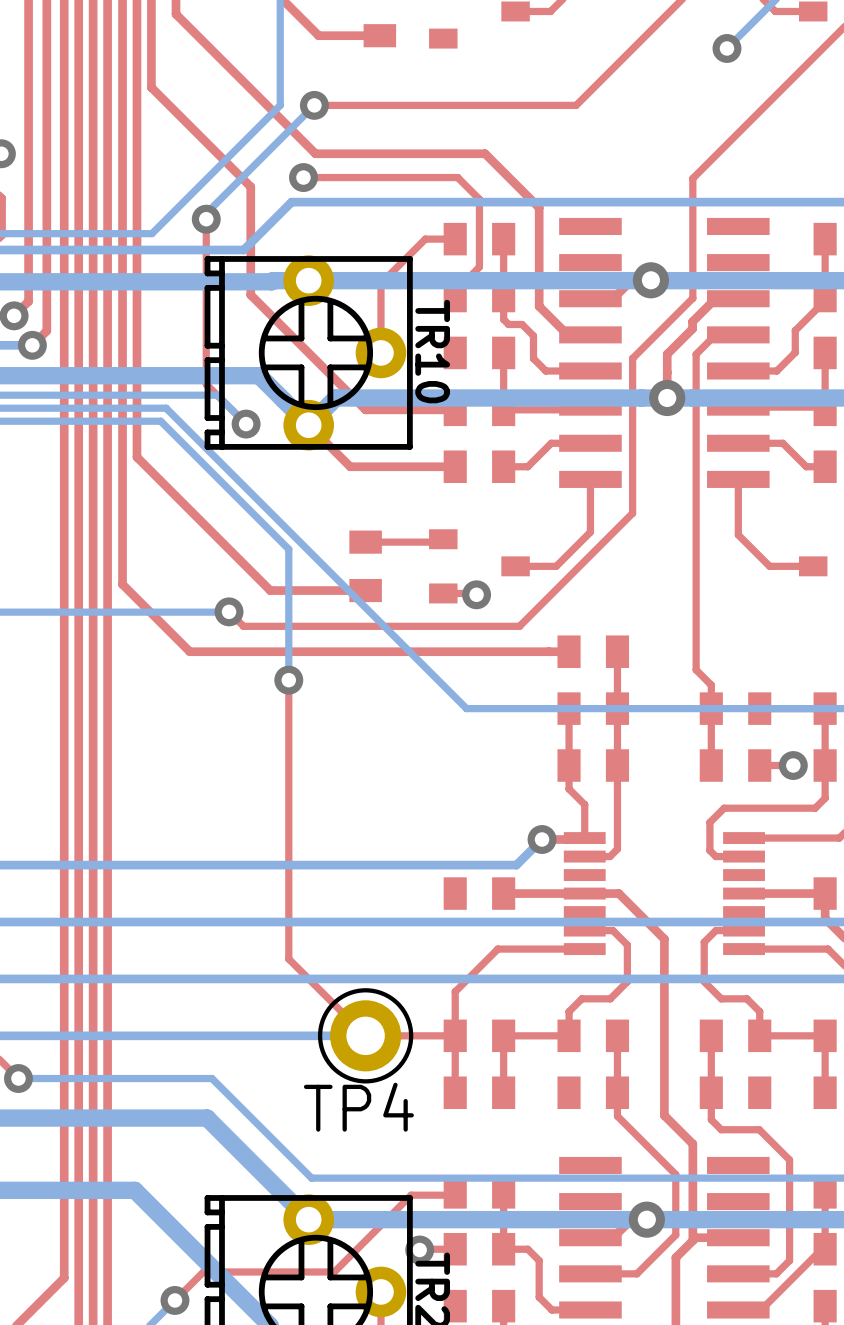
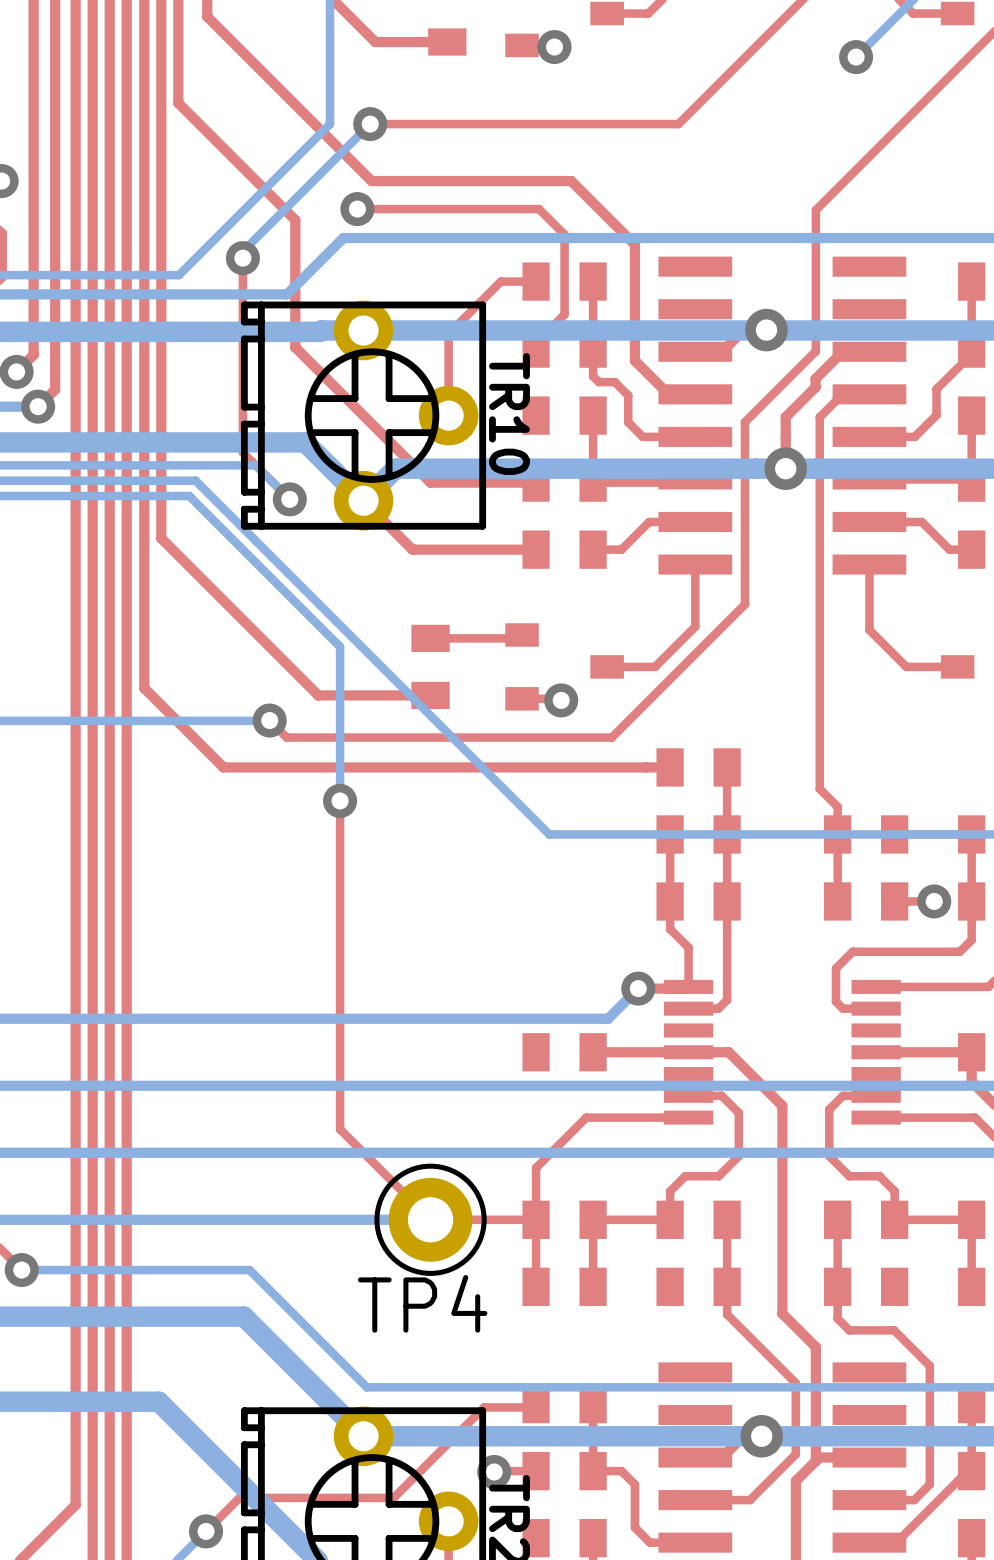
via: none -> (554, 47)

